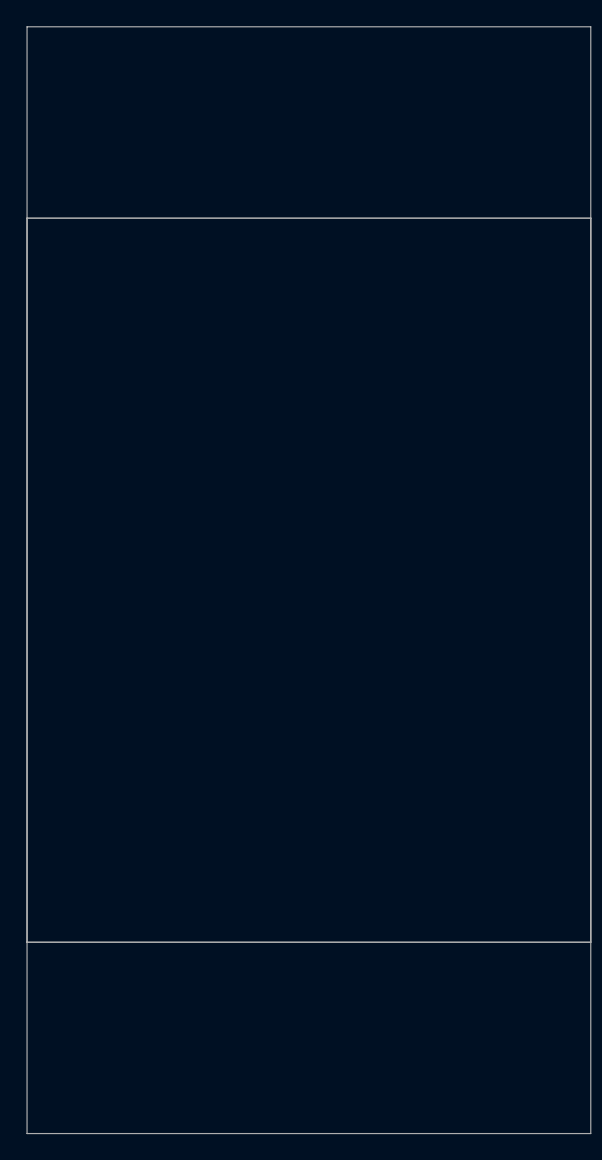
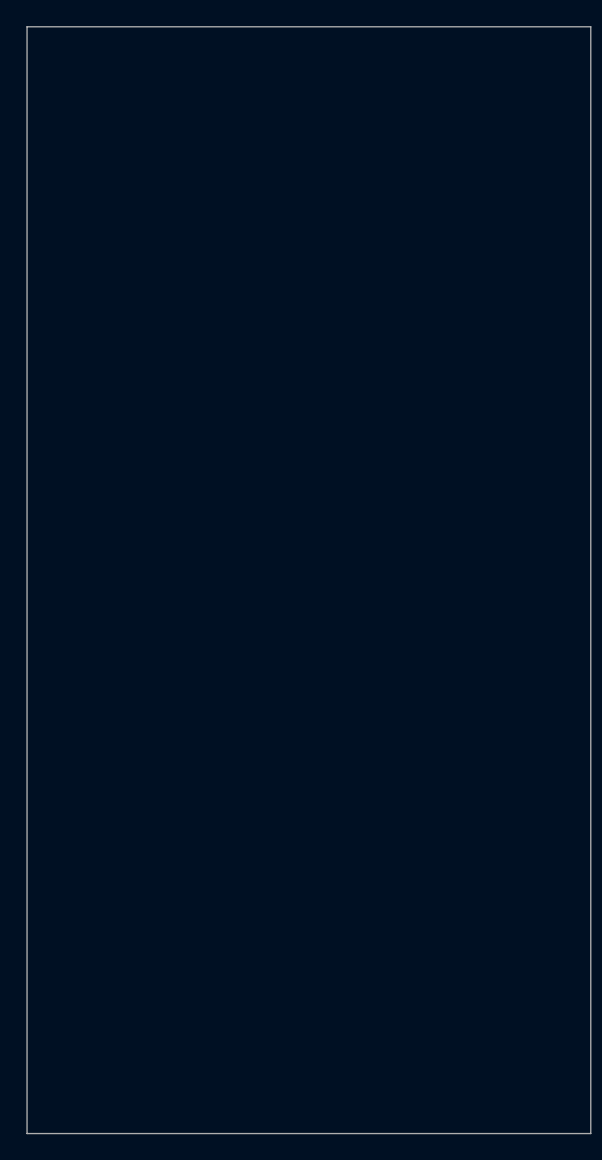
line: (27, 218) (27, 942) (590, 942) (590, 218) (27, 218) -> none

